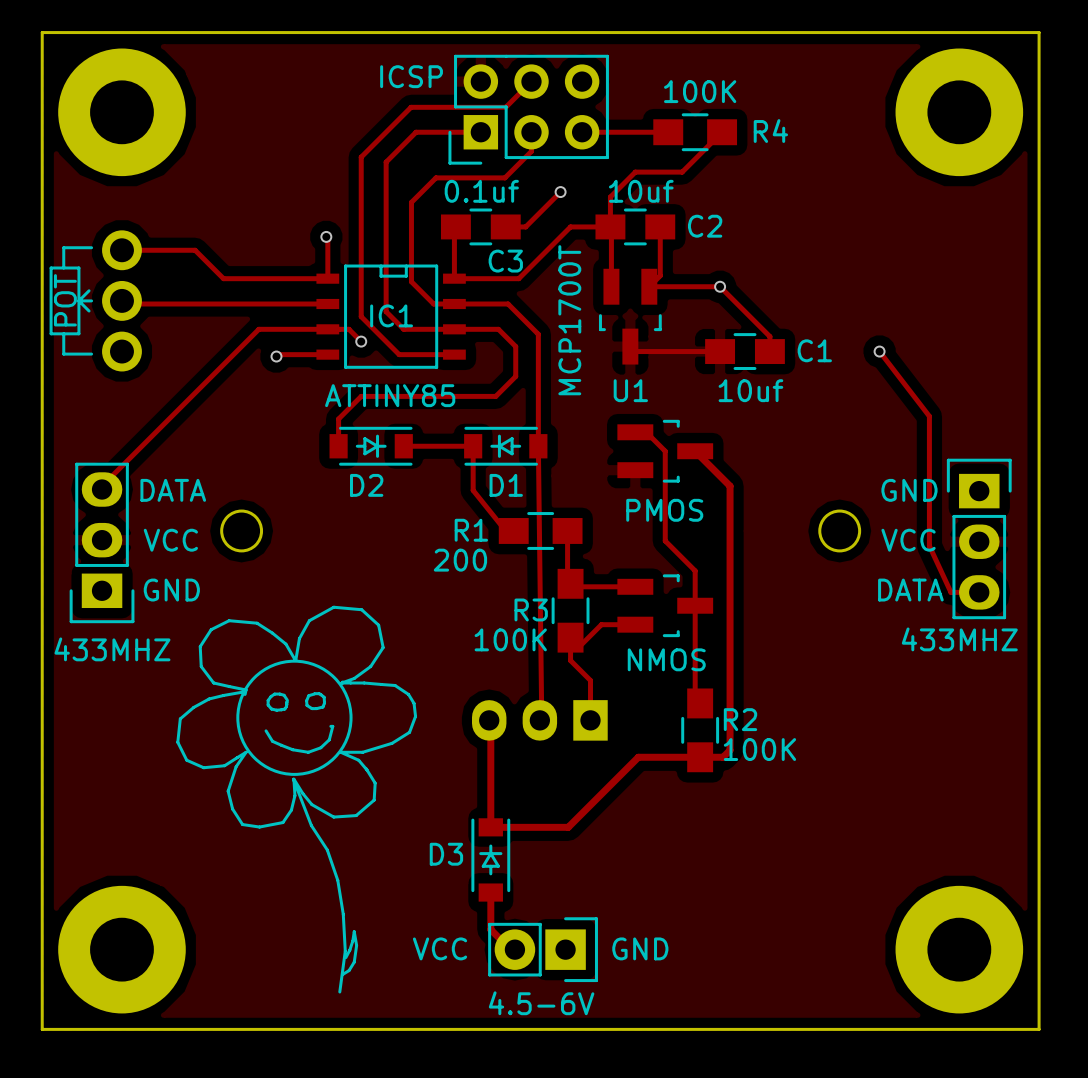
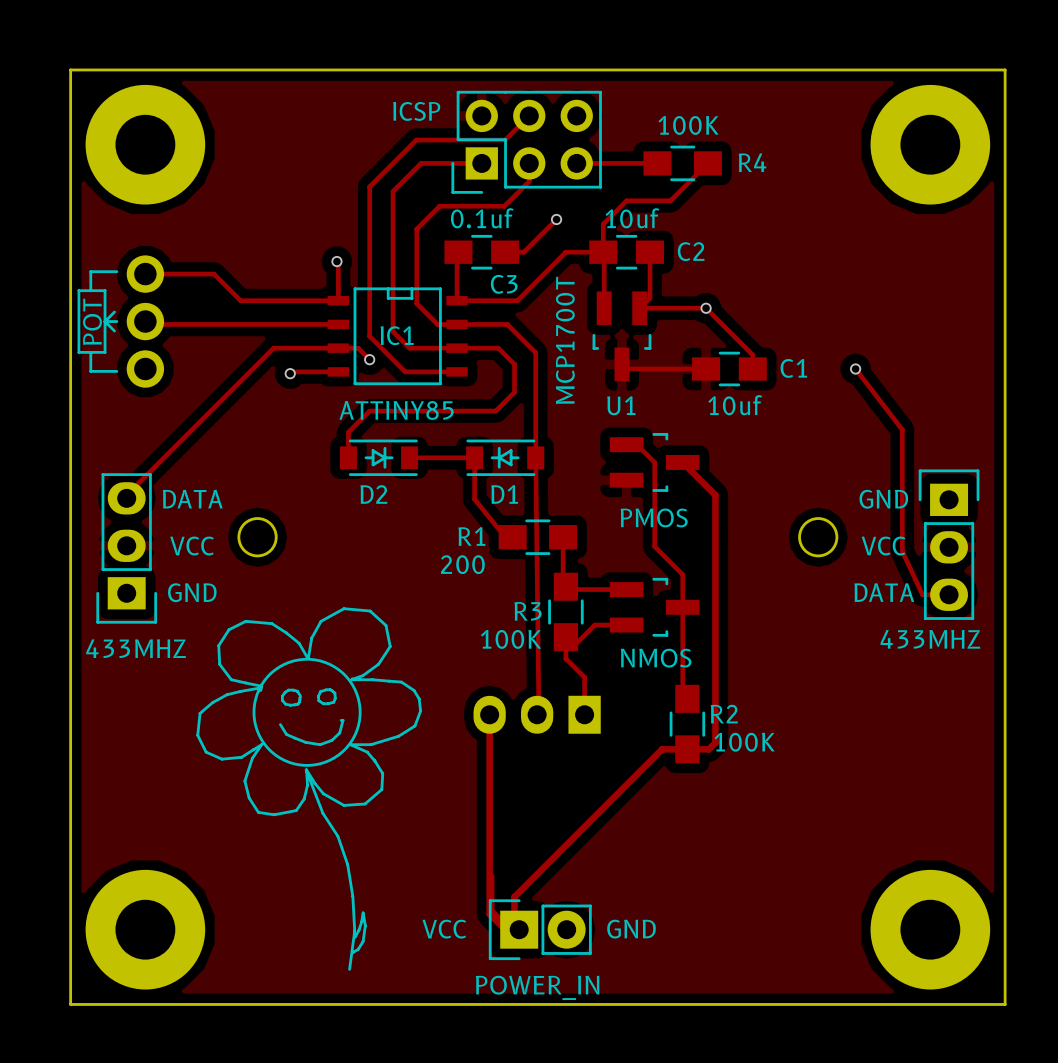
track: (489, 720) (490, 721) (490, 827) (568, 827) (638, 757) (673, 757) -> (489, 714) (489, 914) (514, 939) (514, 896) (662, 749)
D3: (490, 859) -> none
part rotation: 0° (543, 949) -> 180° (540, 929)
text: 4.5-6V (541, 1003) -> none
part value: none -> POWER_IN (537, 987)

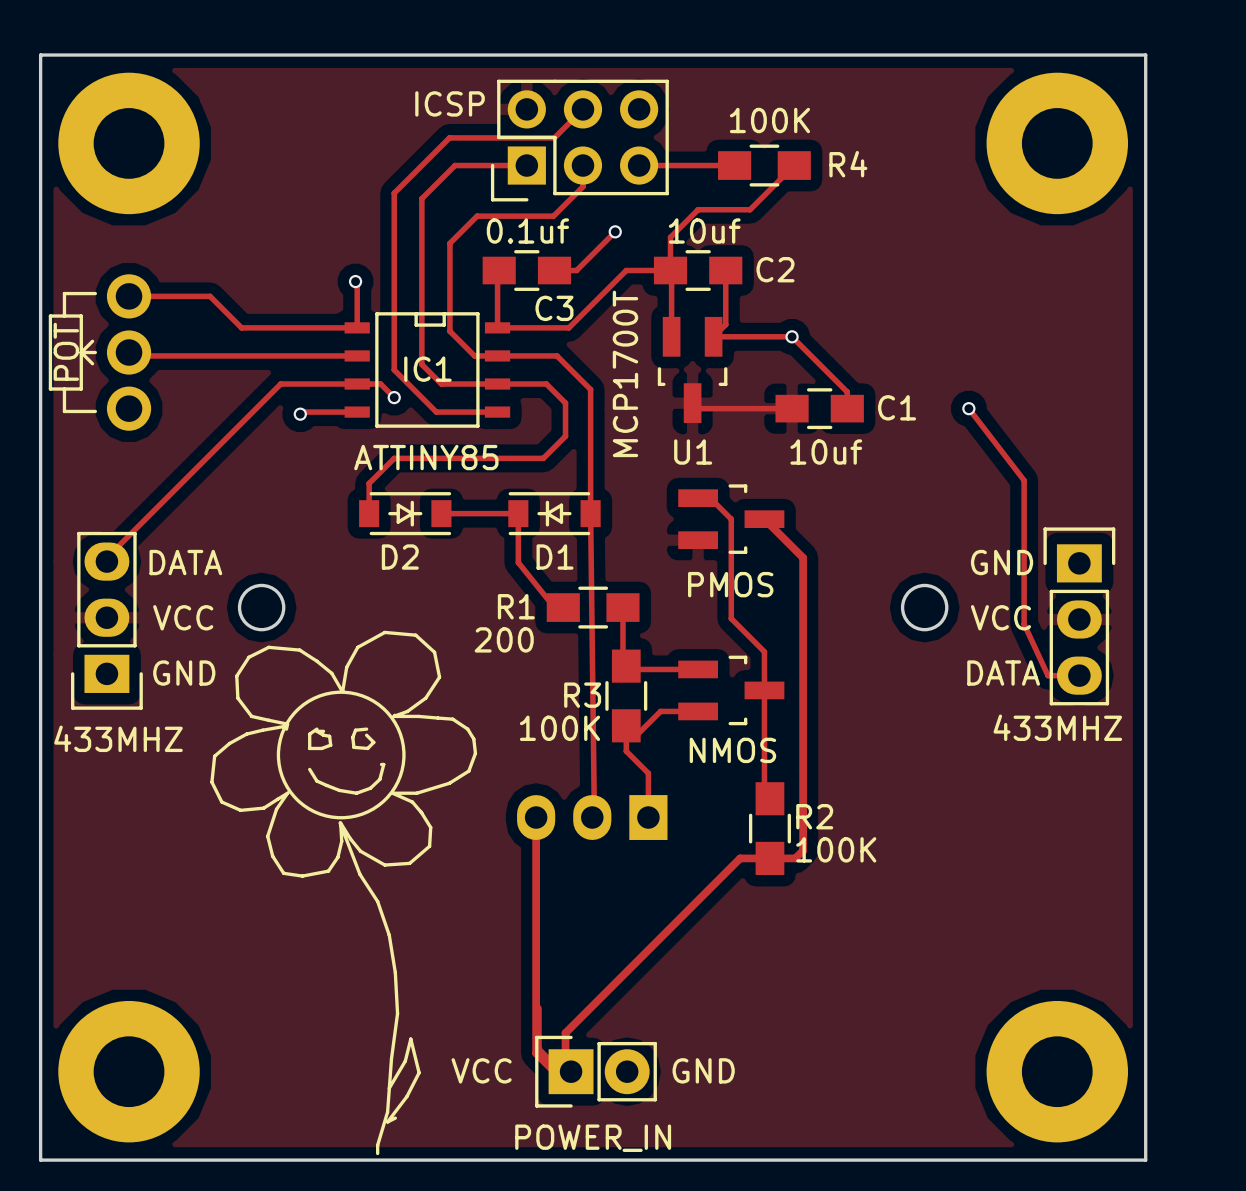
drawing: none -> [210, 630, 478, 1156]
drawing: [196, 607, 423, 971] -> none

